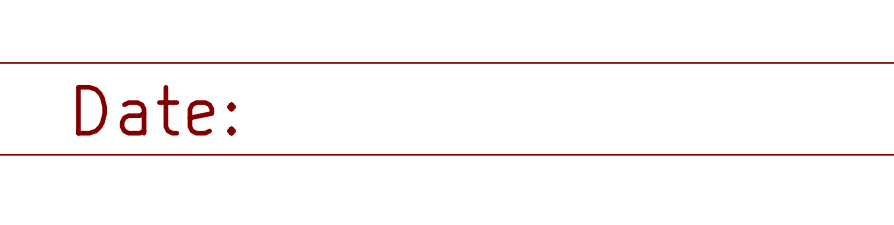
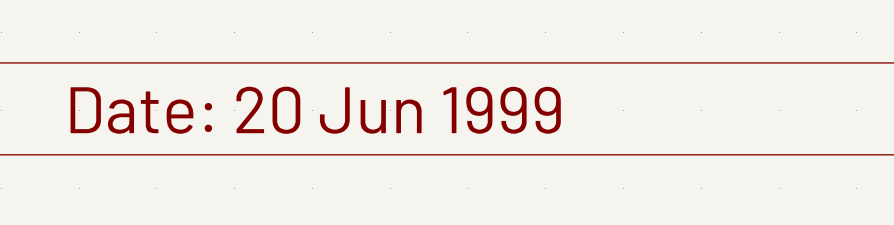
title block: Date: (156, 110) -> Date: 20 Jun 1999 (315, 110)

